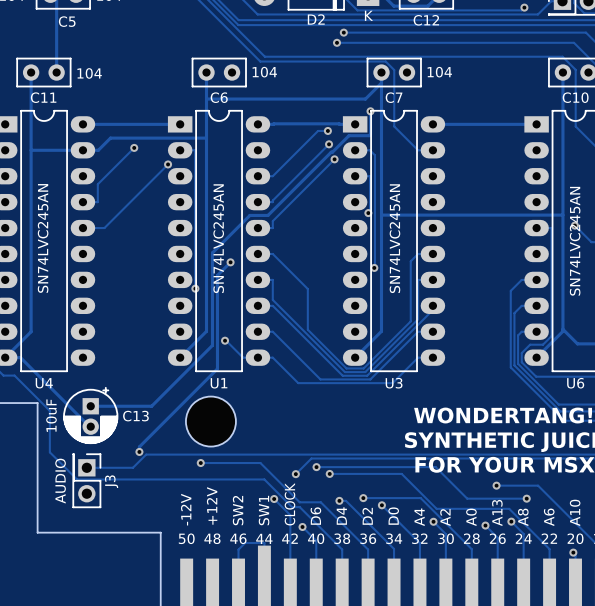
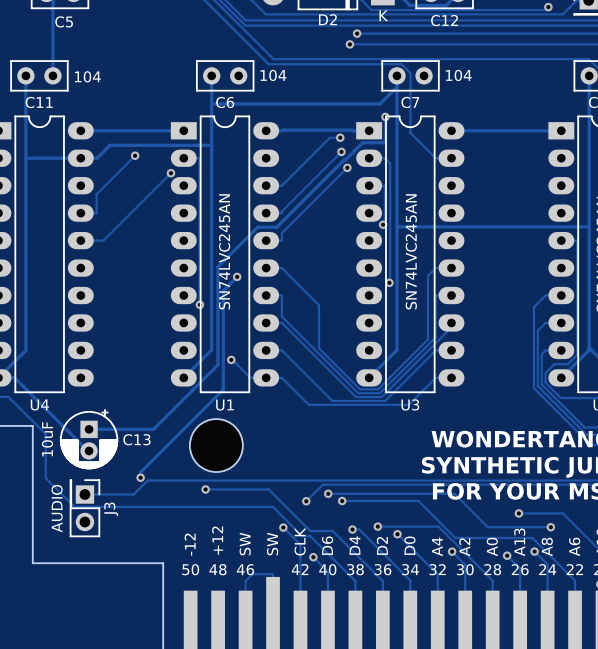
U4 value: SN74LVC245AN (43, 238) -> none
text: CLOCK (289, 504) -> CLK (300, 541)
text: +12V (212, 505) -> +12 (217, 540)
text: -12V (186, 509) -> -12 (190, 544)
text: SW2 (238, 510) -> SW (245, 544)
text: SW1 (264, 510) -> SW (272, 544)
text: 44 (264, 538) -> none

